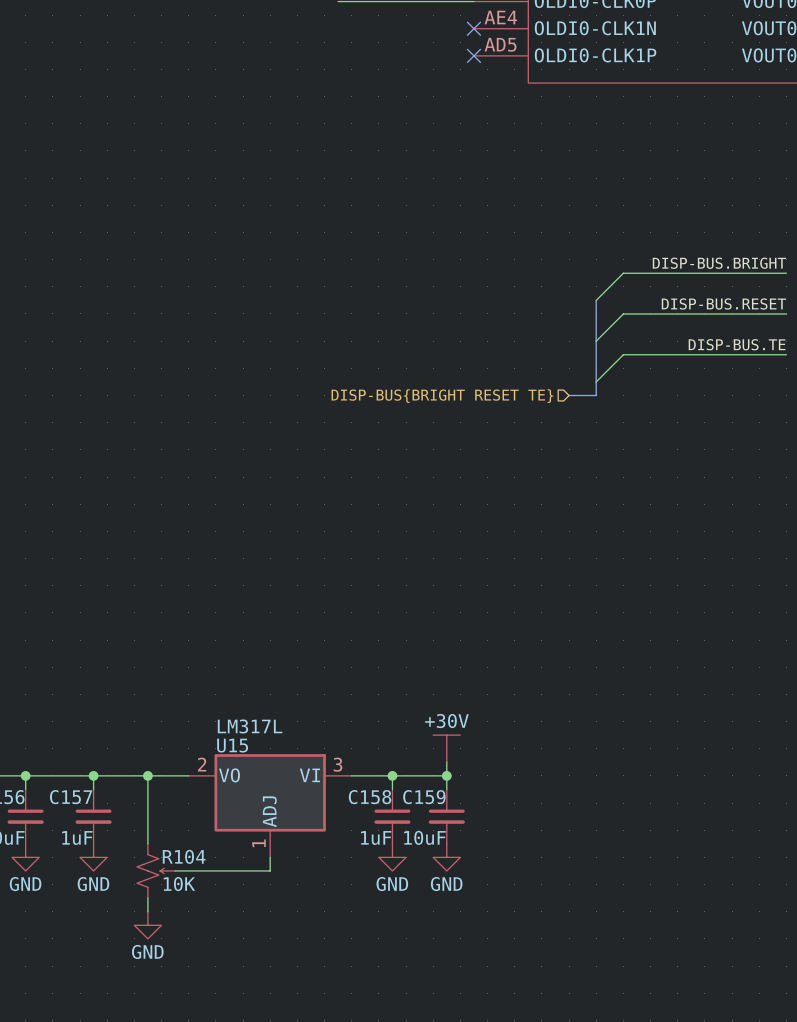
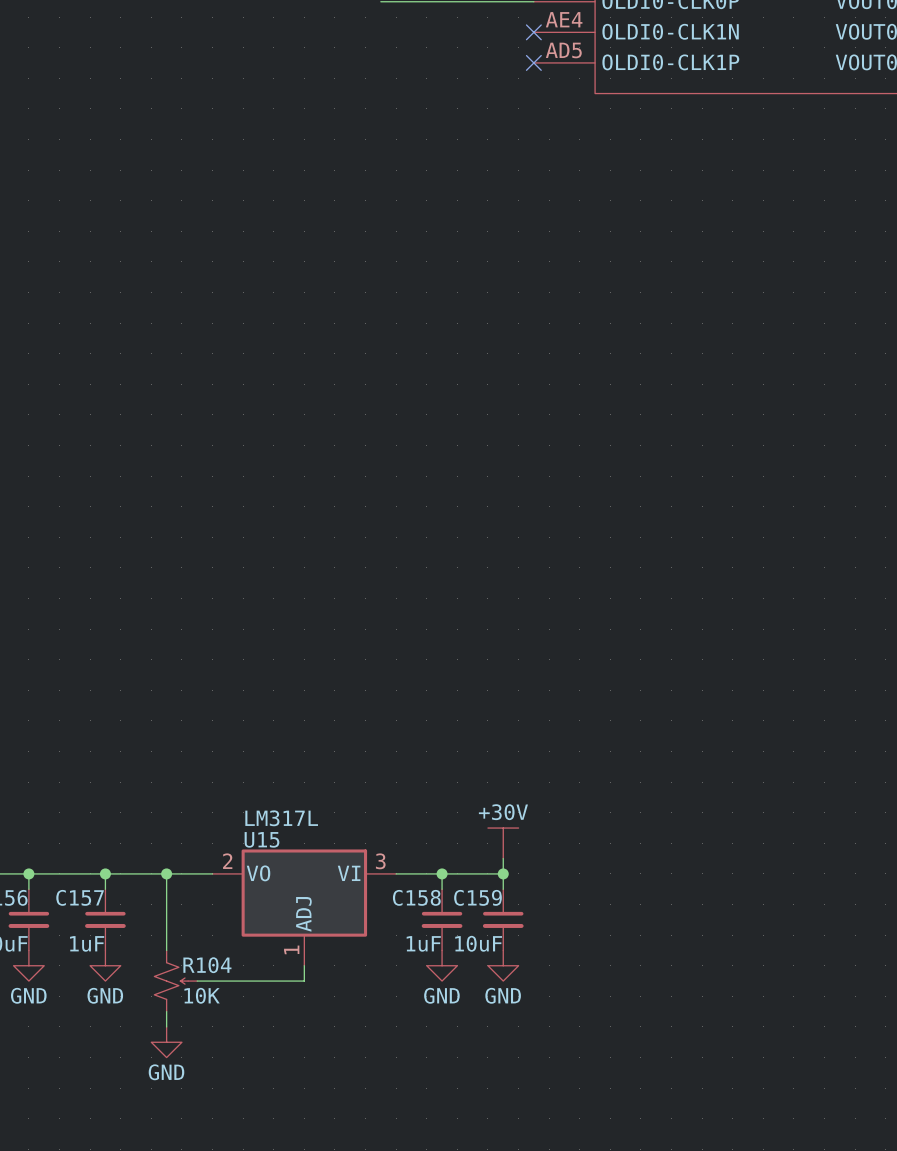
label: DISP-BUS.BRIGHT (719, 263) -> none
wire: (786, 273) (623, 273) (596, 300) -> none
bus: (596, 300) (596, 395) (569, 395) -> none
label: DISP-BUS.RESET (723, 303) -> none
wire: (786, 313) (623, 313) (596, 341) -> none
label: DISP-BUS.TE (737, 344) -> none
wire: (786, 354) (623, 354) (596, 381) -> none
hierarchical label: DISP-BUS{BRIGHT RESET TE} (442, 396) -> none

